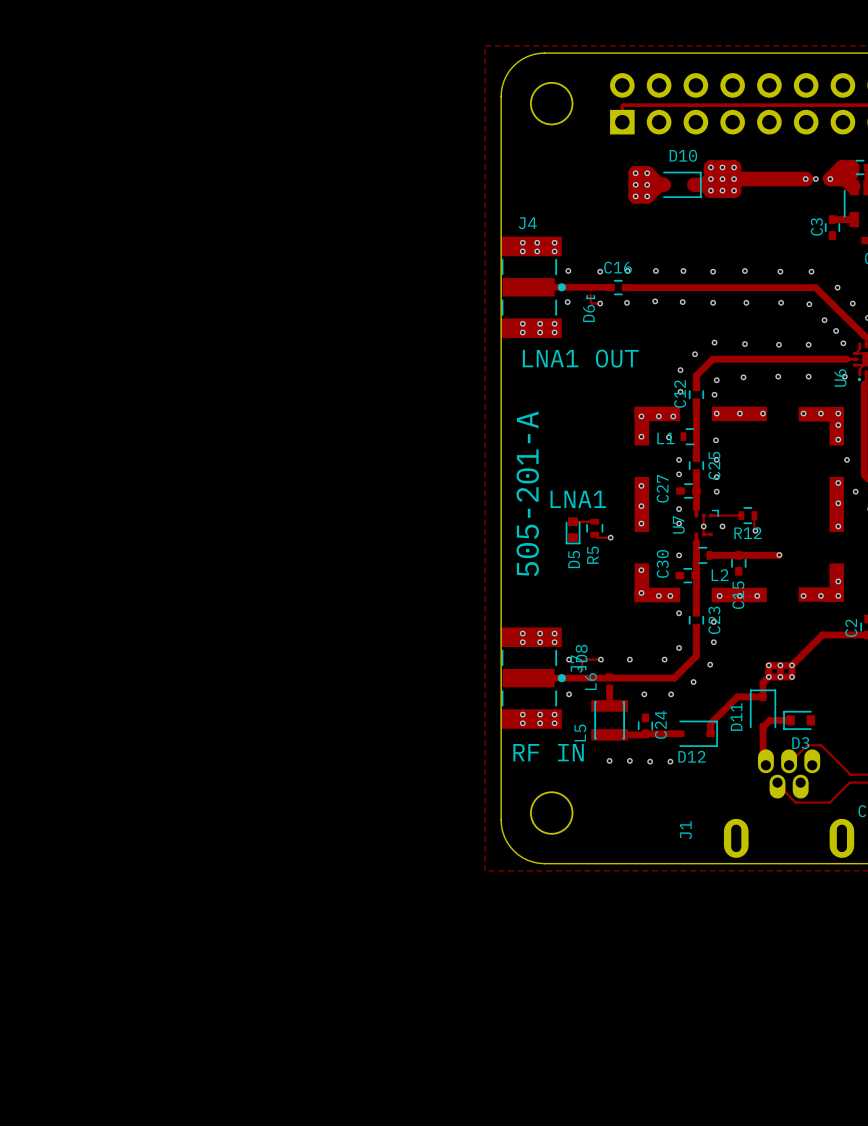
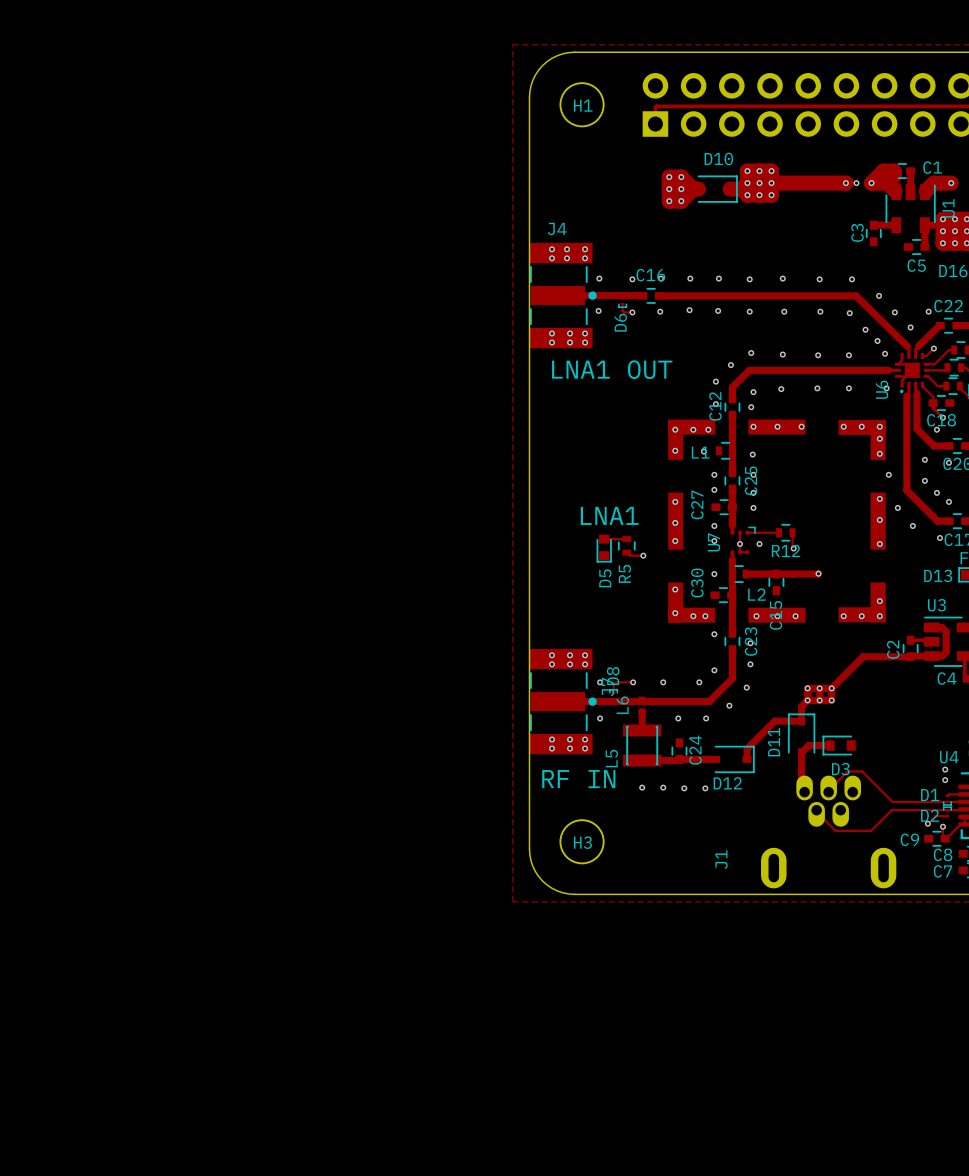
H1 name: none -> H1 (583, 105)
text: 505-201-A (527, 493) -> none
H3 name: none -> H3 (582, 842)

